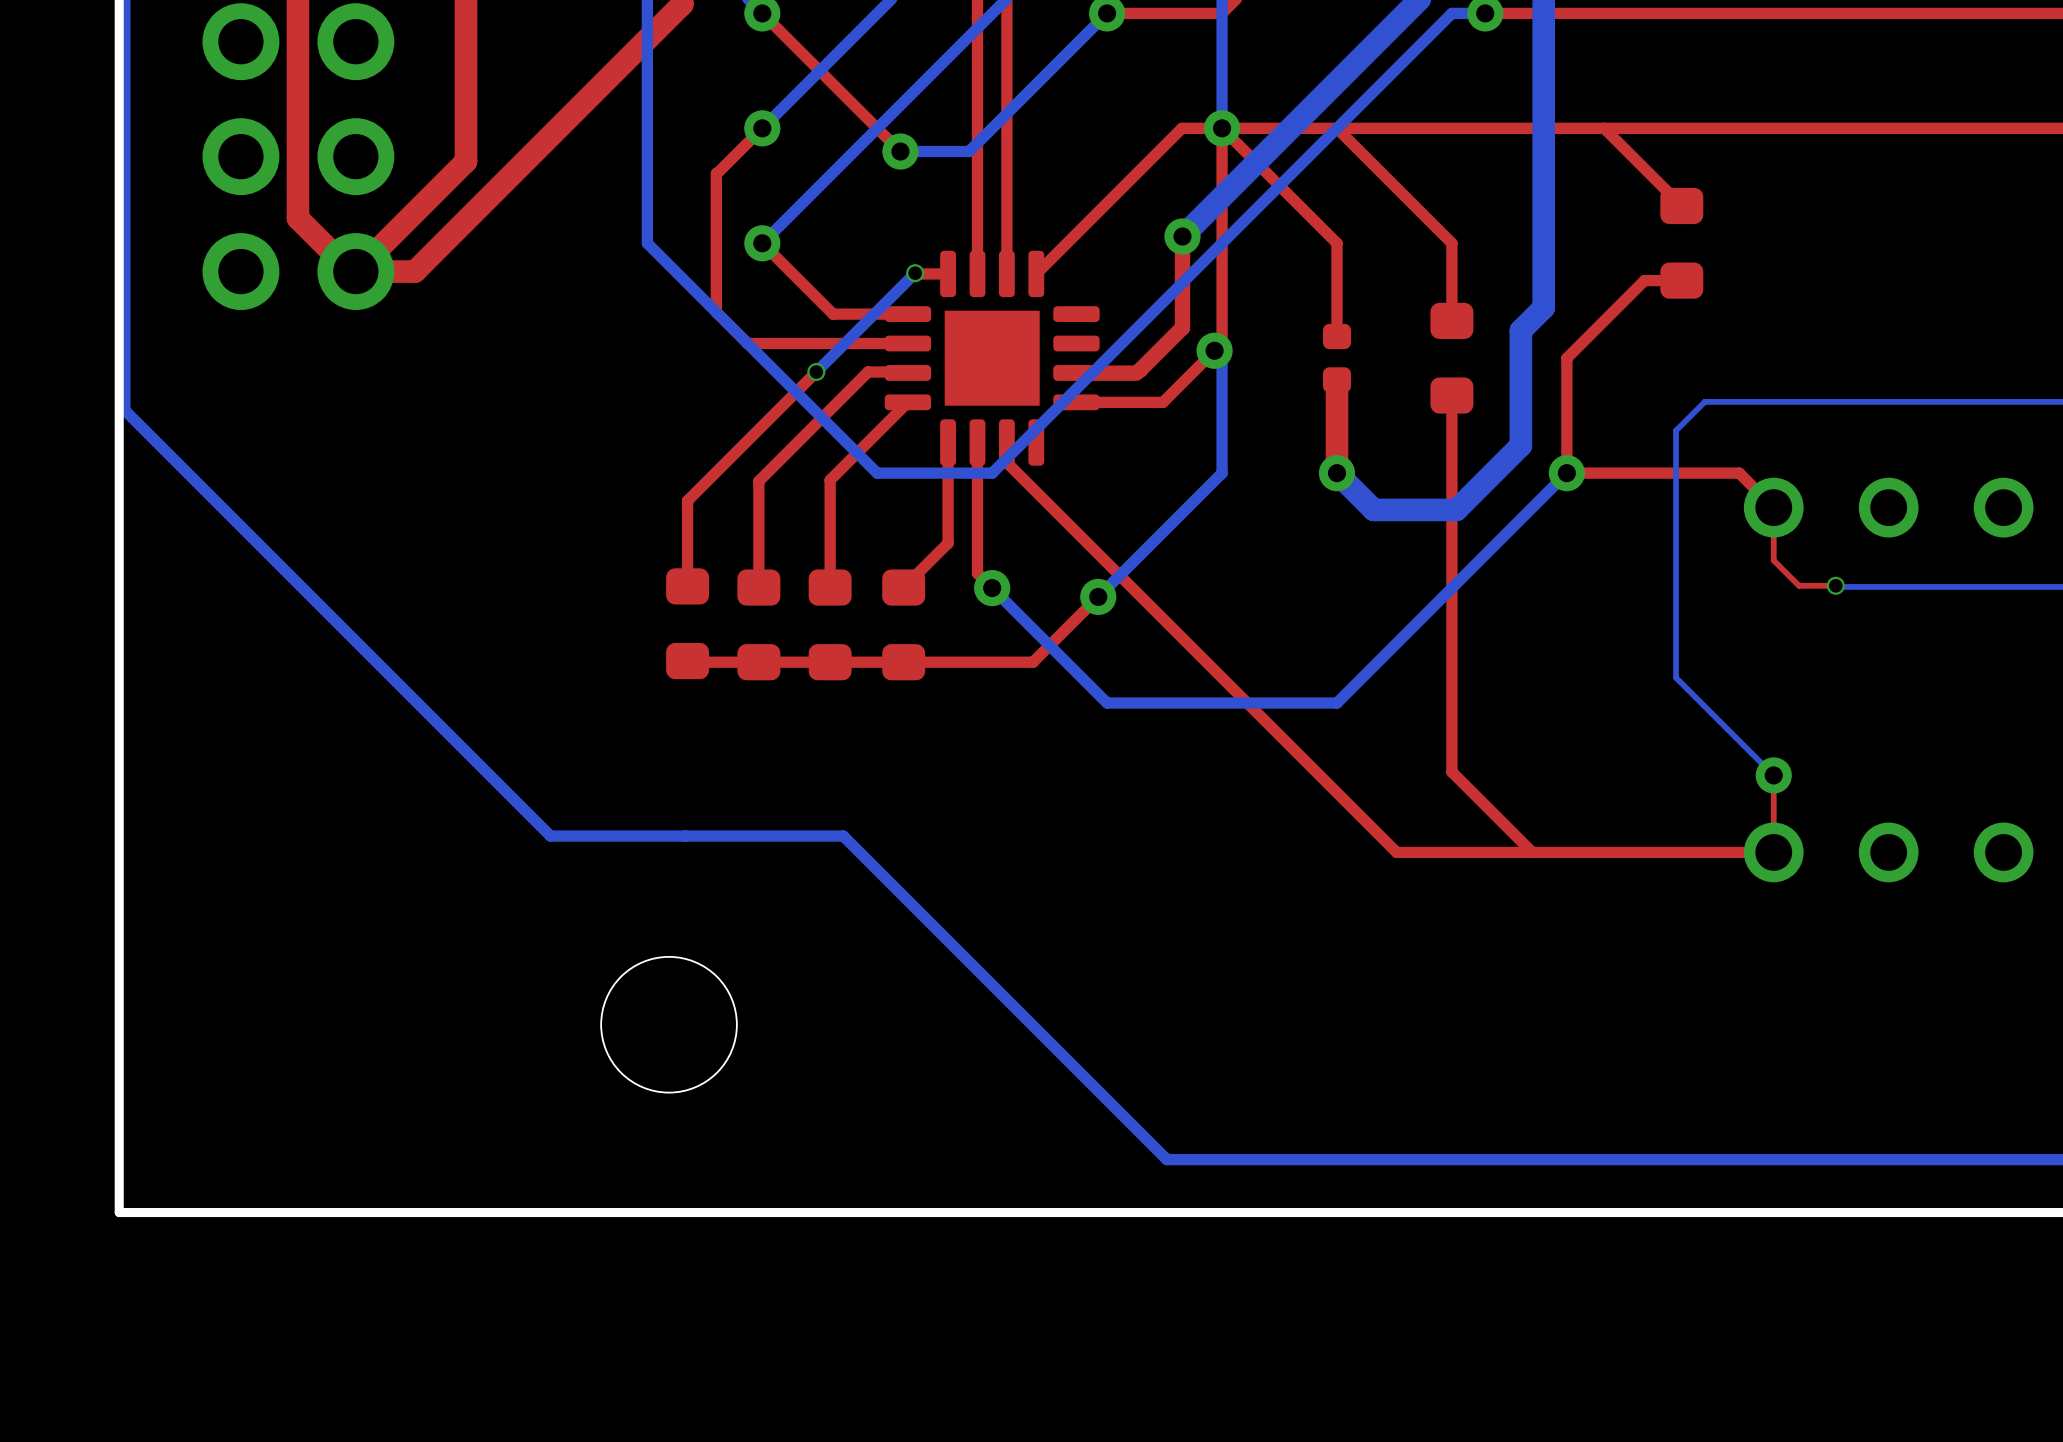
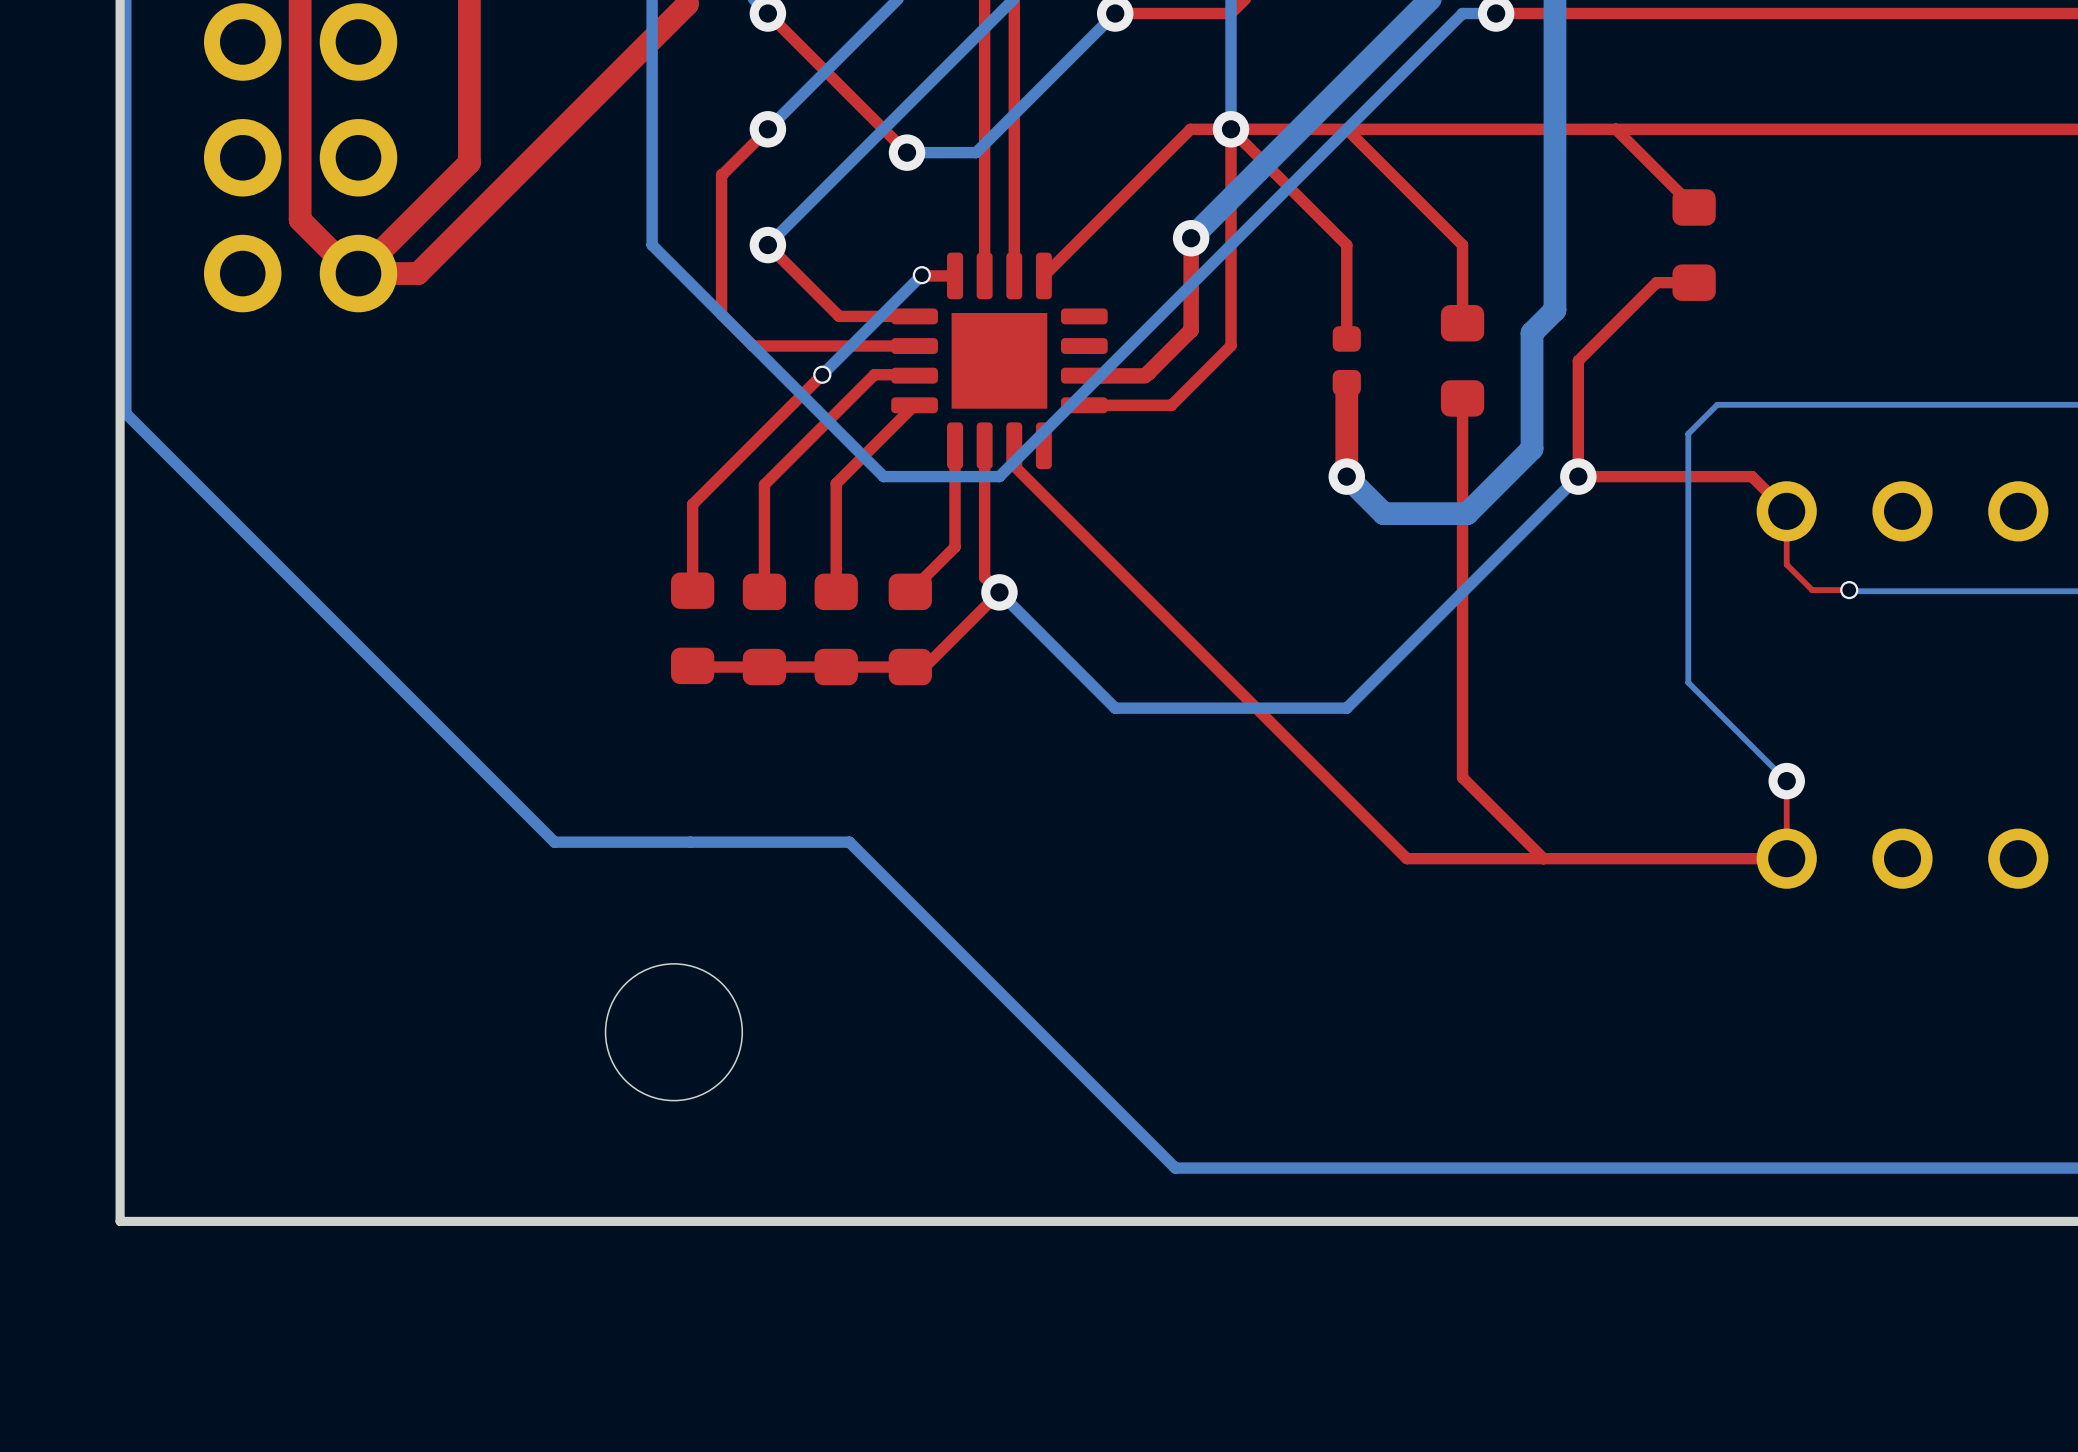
bottom track: (1214, 350) (1222, 358) (1222, 473) (1098, 596) -> none
via: (1214, 350) -> none
top track: (1098, 596) (1033, 662) (918, 662) -> (999, 592) (924, 667)
via: (1098, 596) -> none

